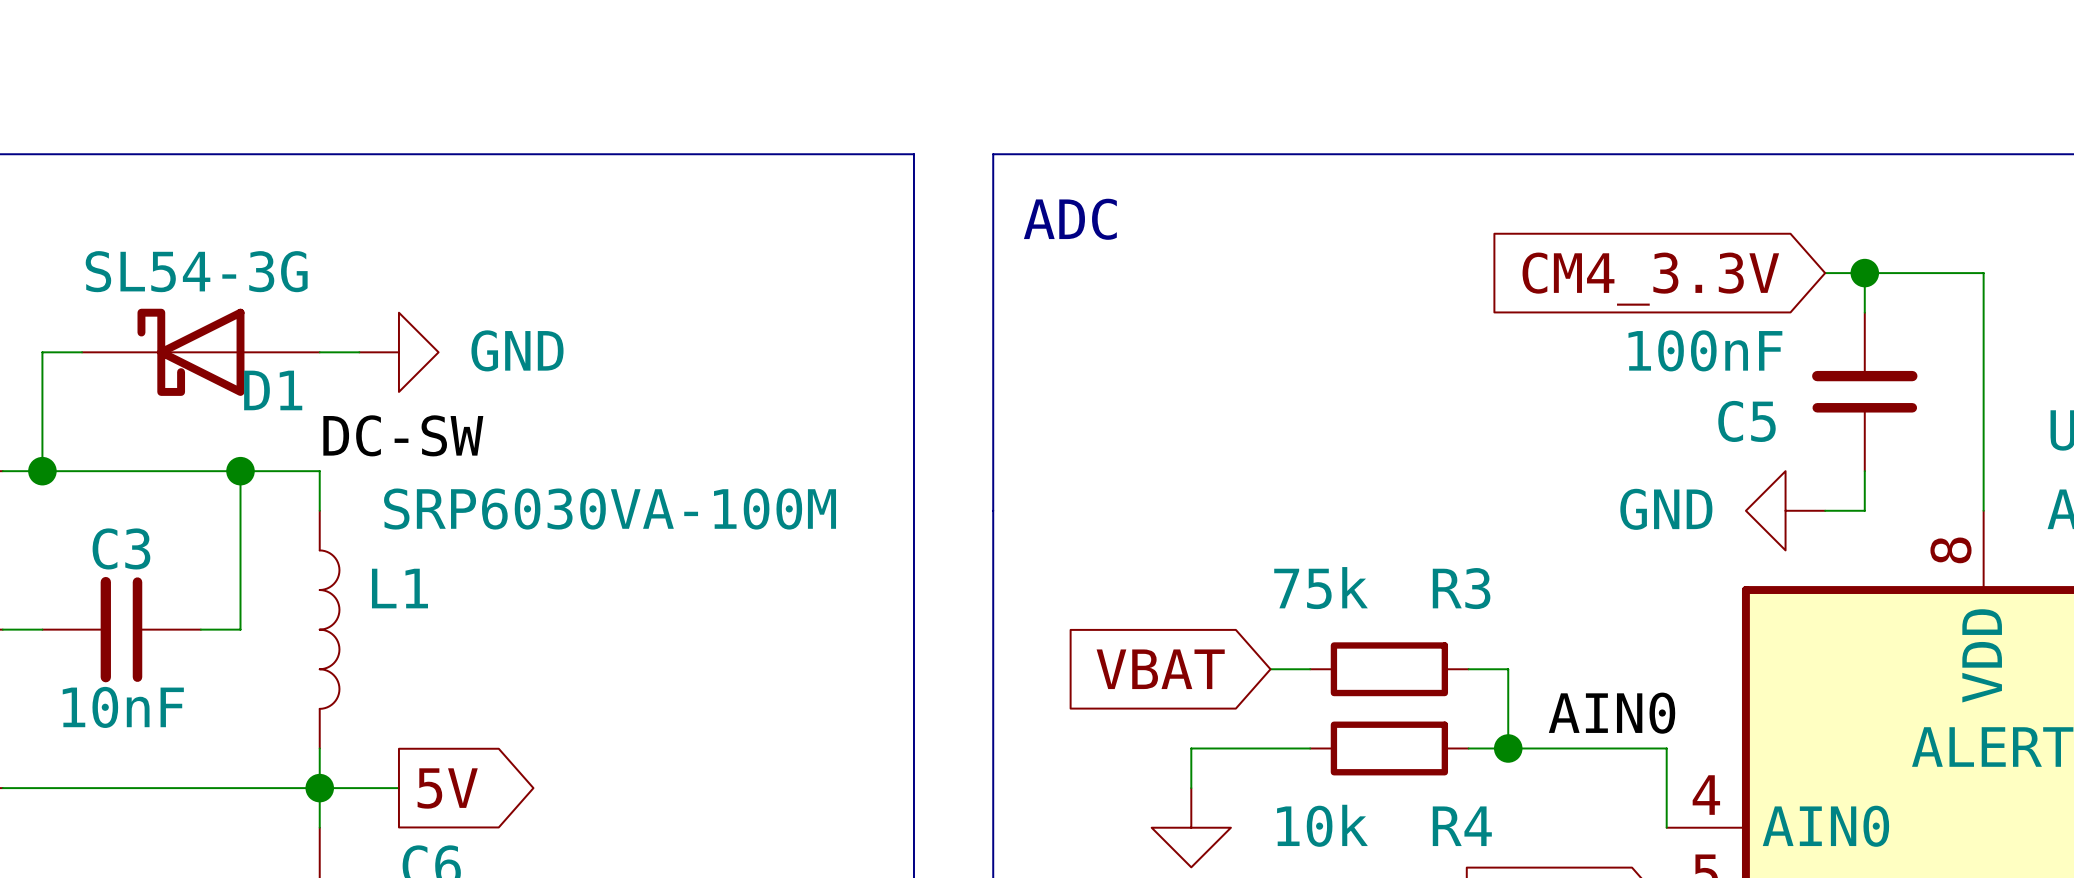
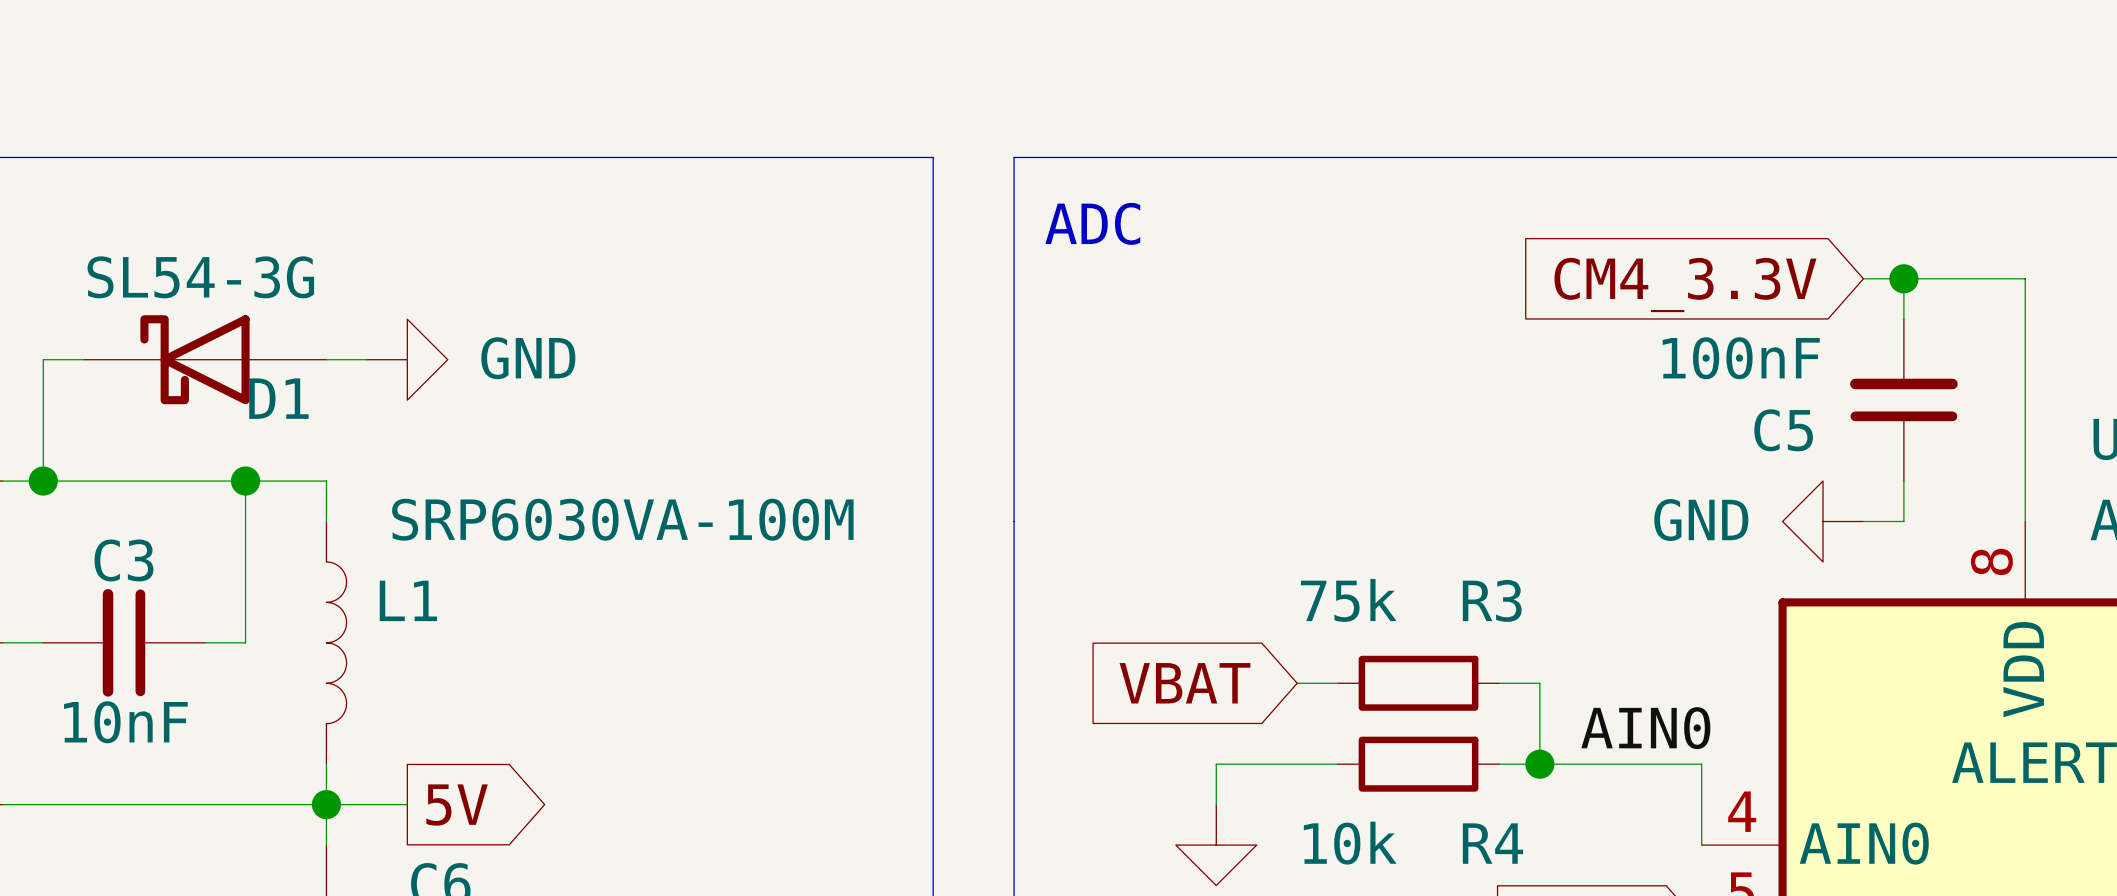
label: DC-SW (403, 435) -> none

